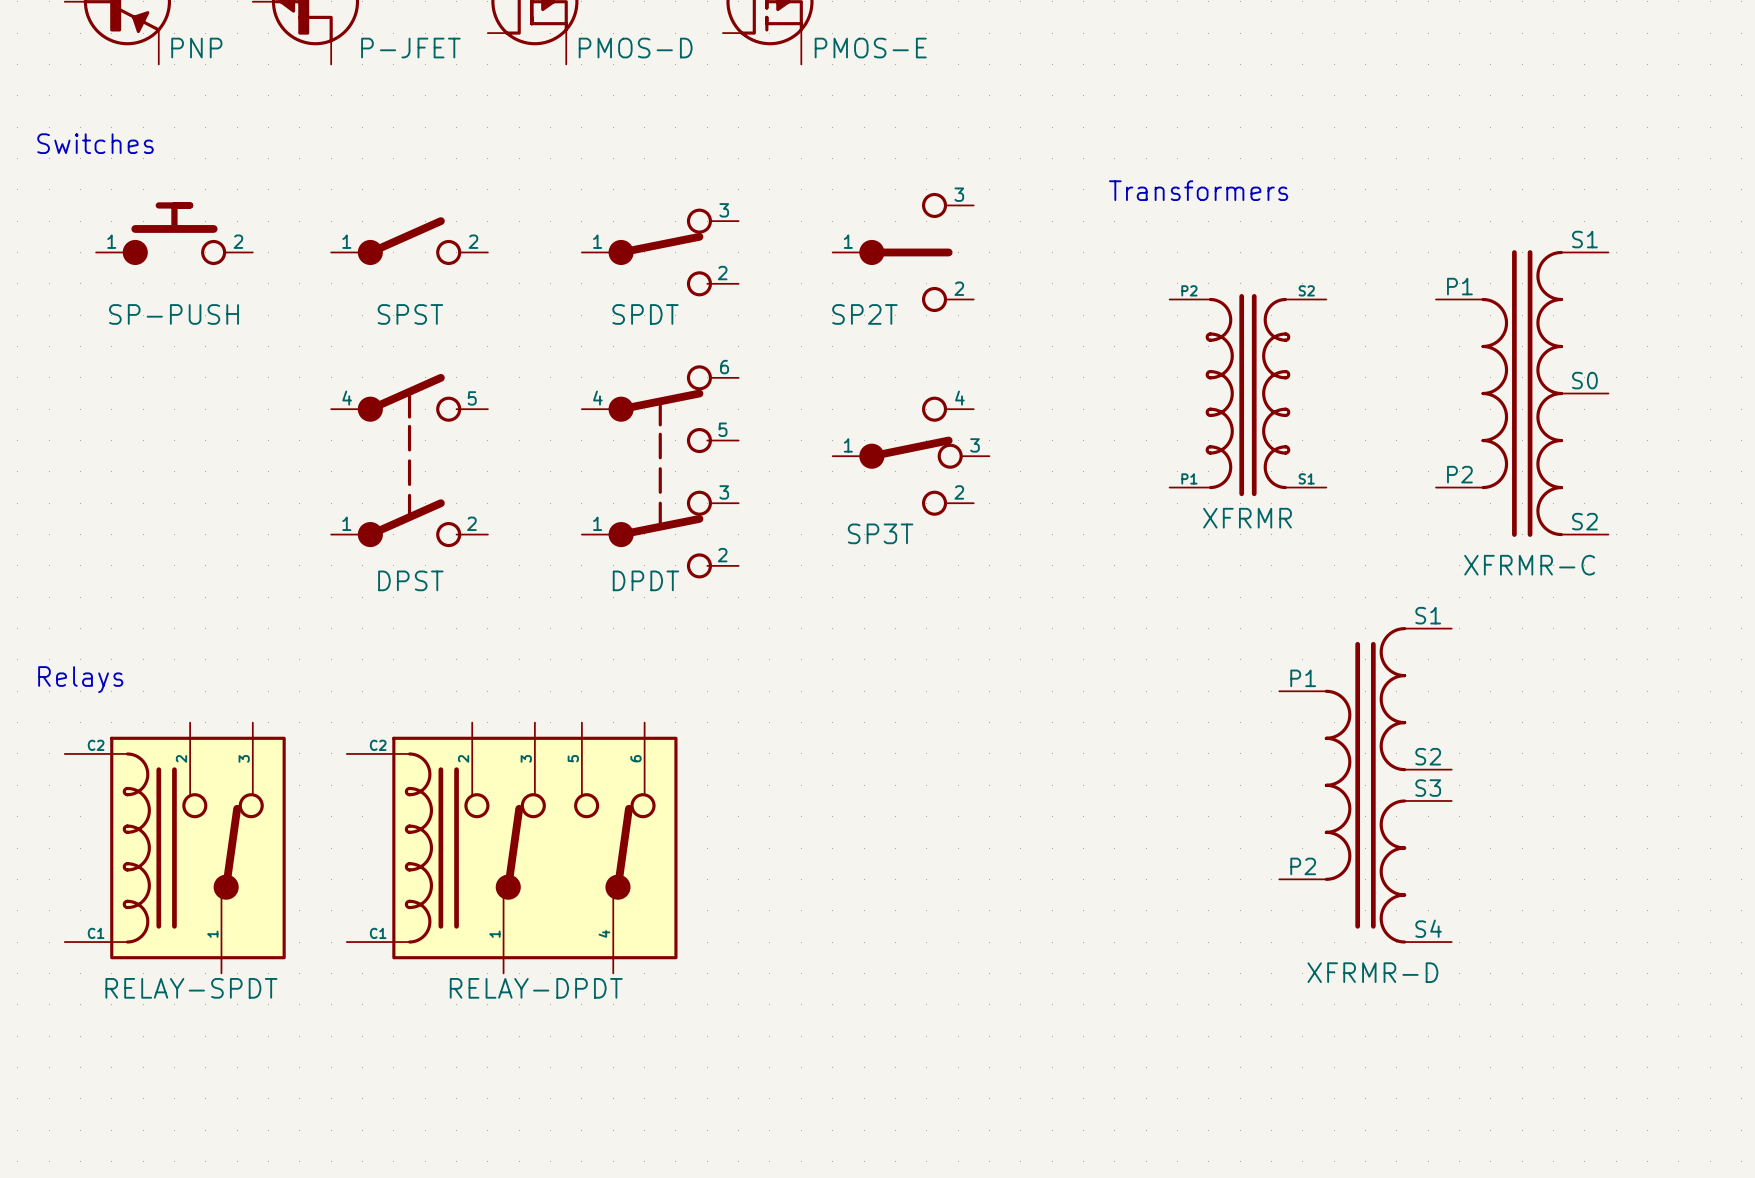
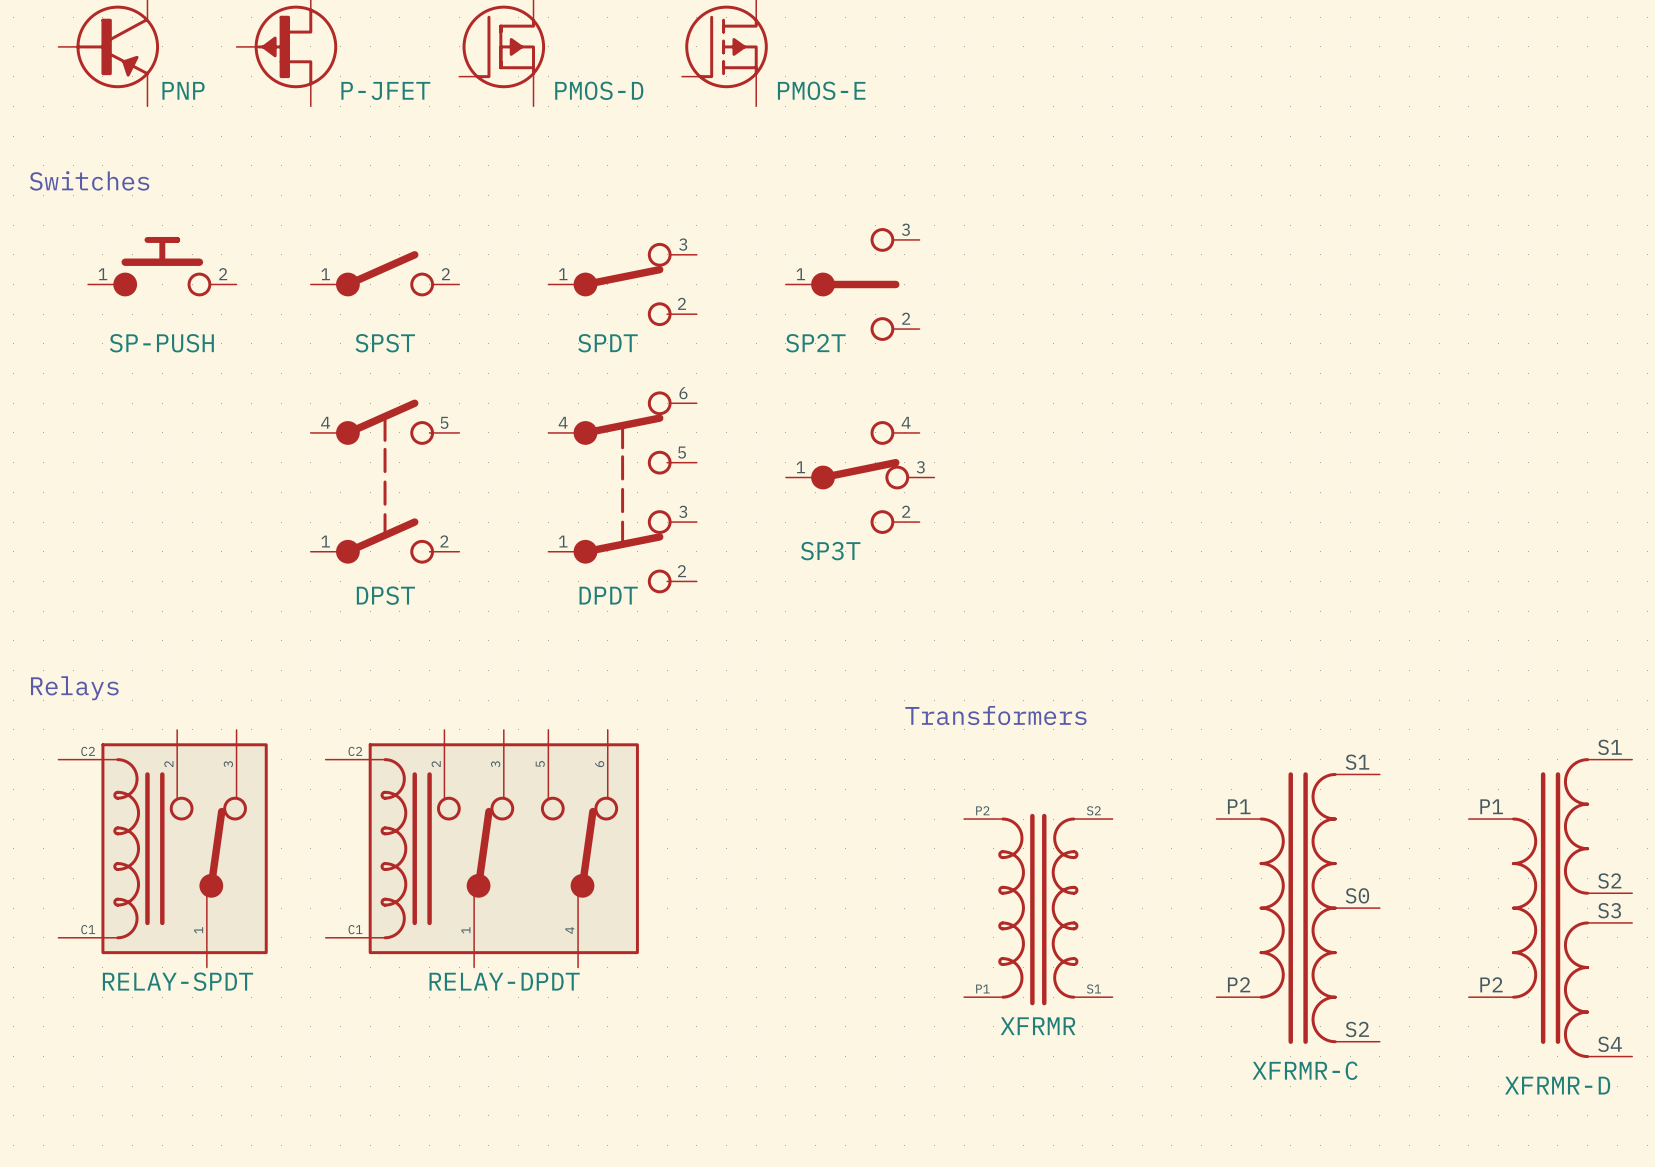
text: Transformers (1198, 190) -> none
part: XFRMR-C (1522, 393) -> none
part: XFRMR (1247, 395) -> none
text: none -> Transformers (995, 715)
part position: (1365, 785) -> (1550, 908)
part: none -> XFRMR-C (1298, 908)
part: none -> XFRMR (1038, 909)

